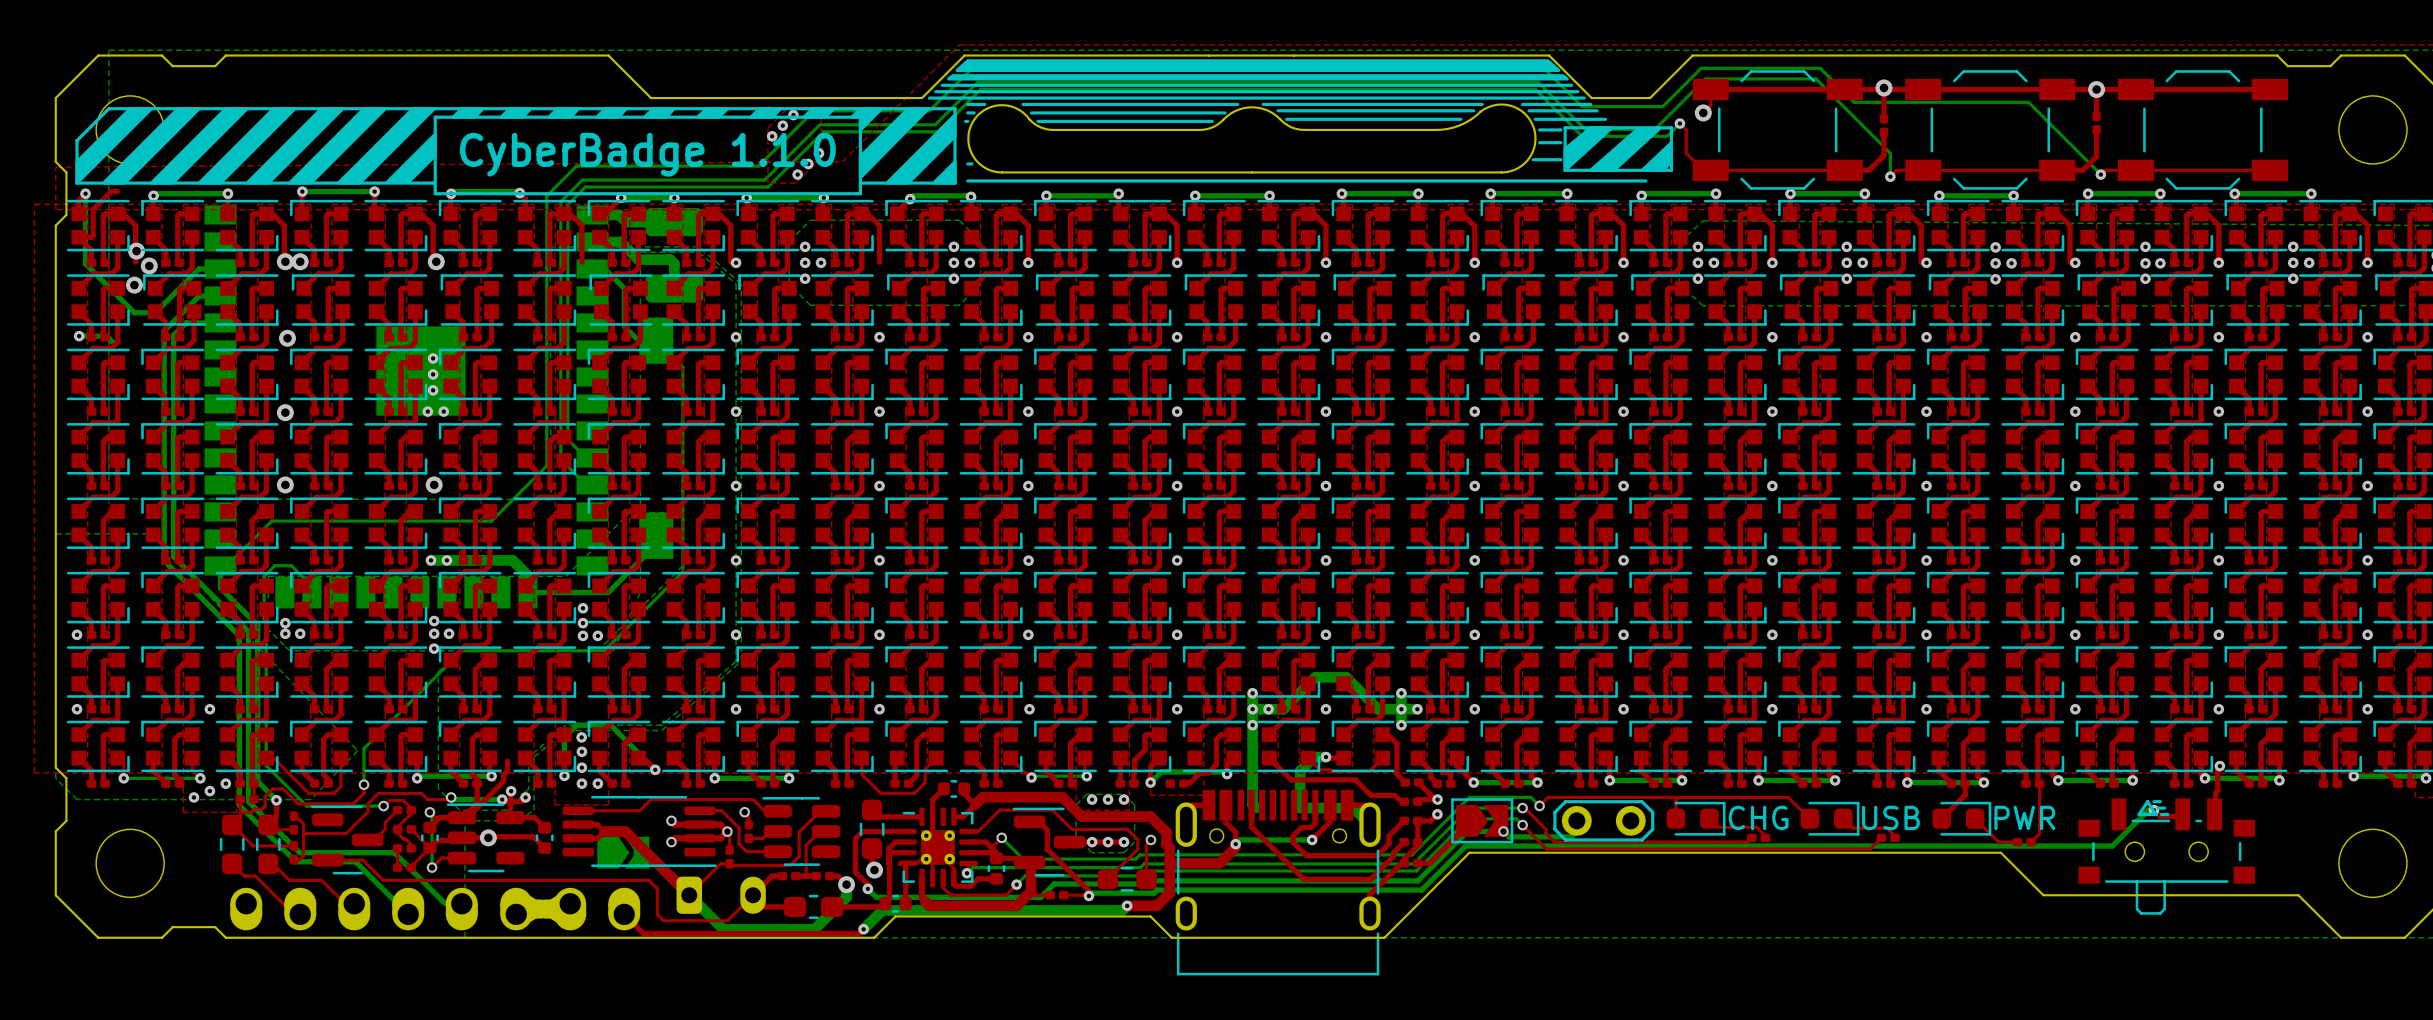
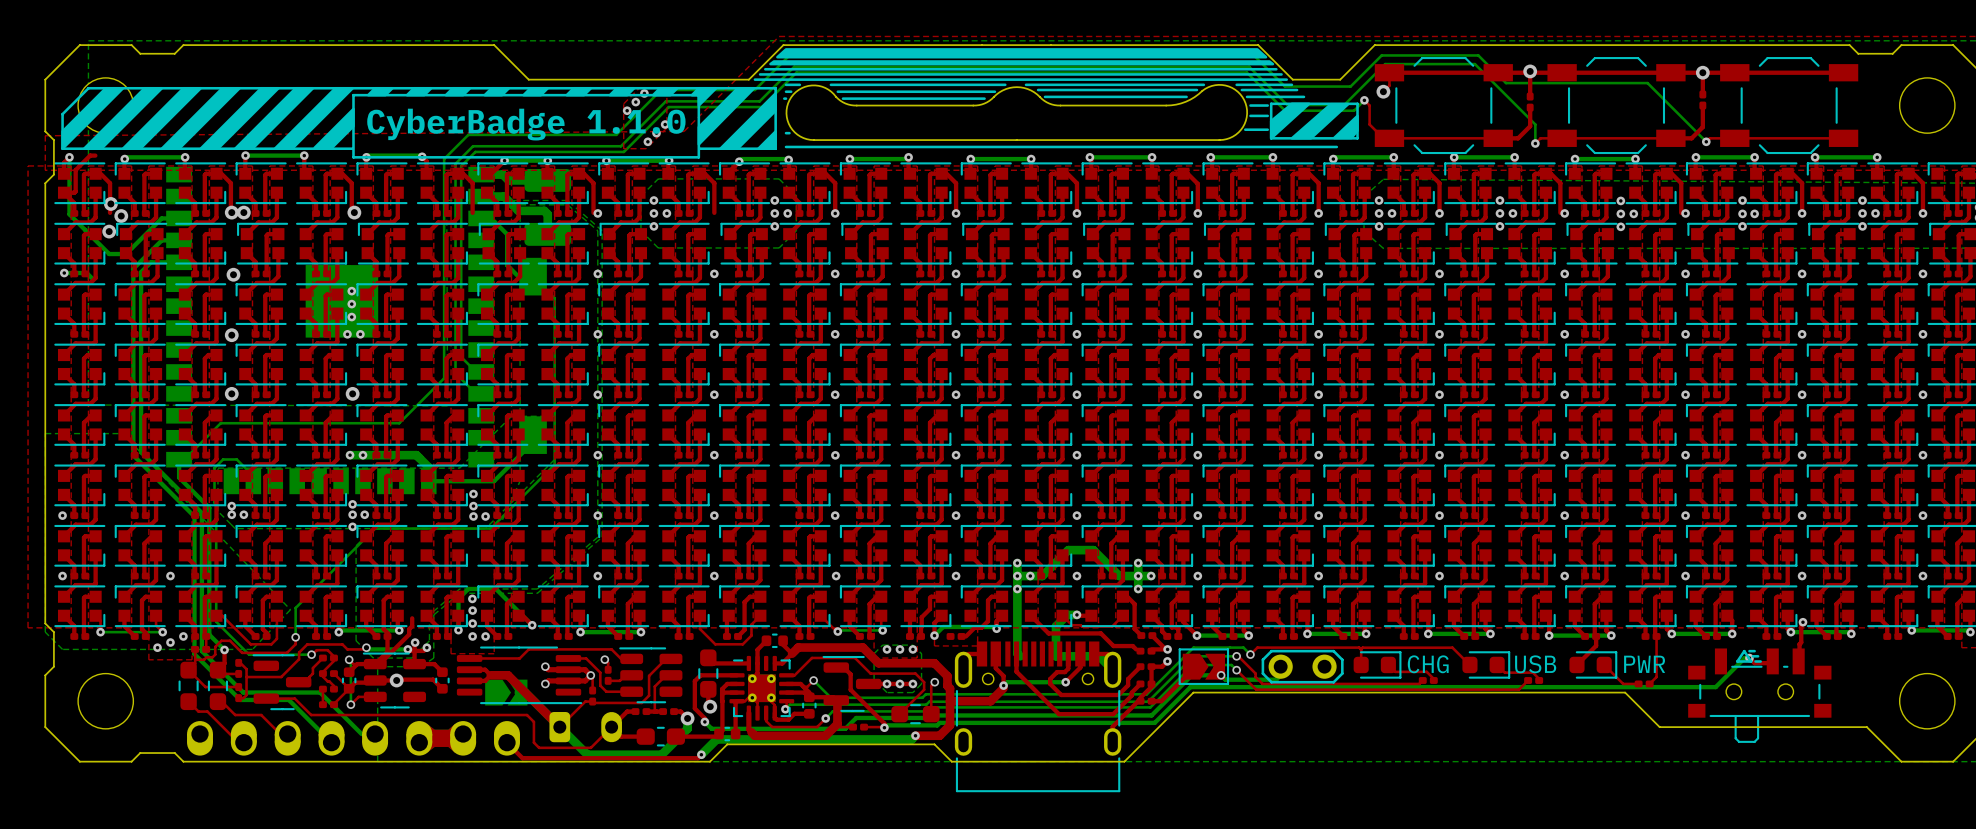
part footprint: [230, 887, 641, 931] -> [187, 721, 520, 756]

